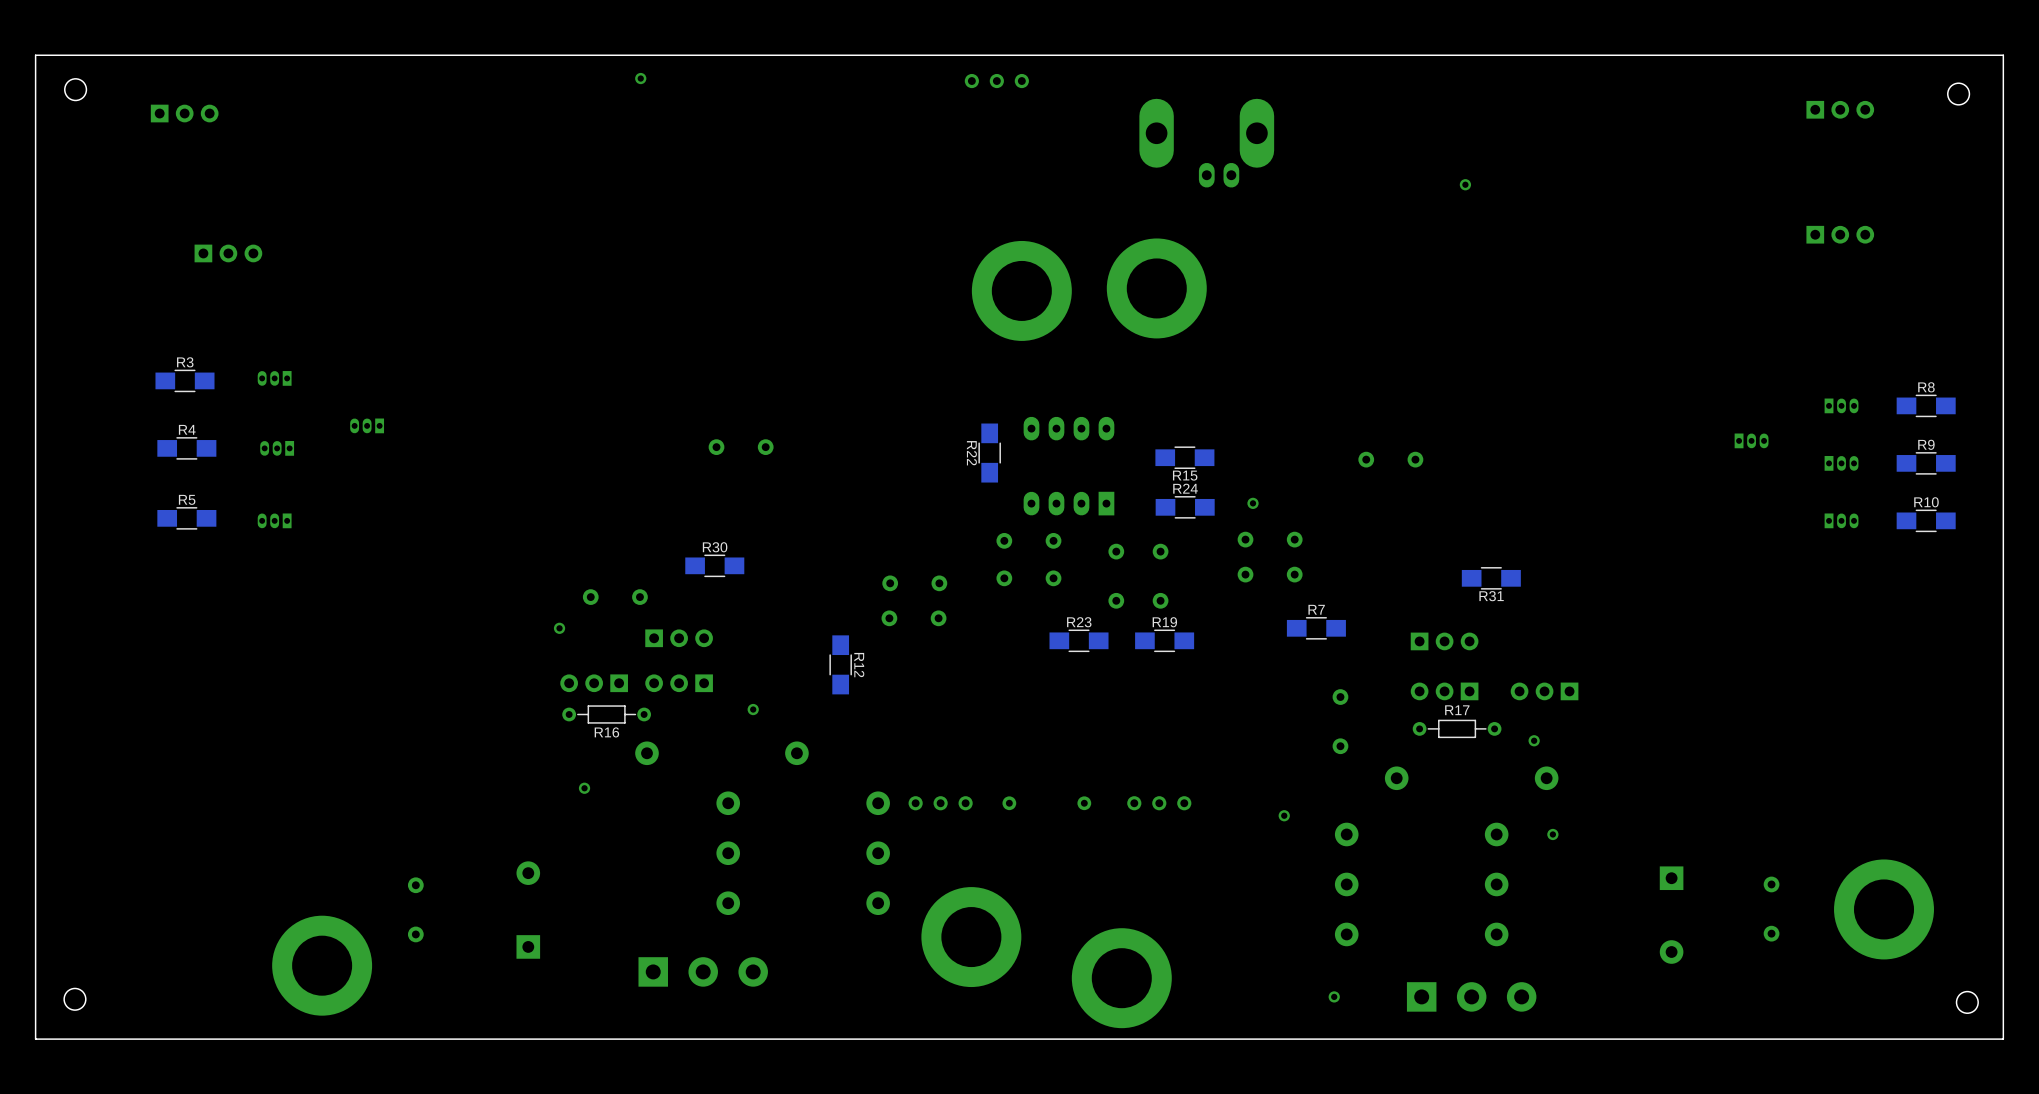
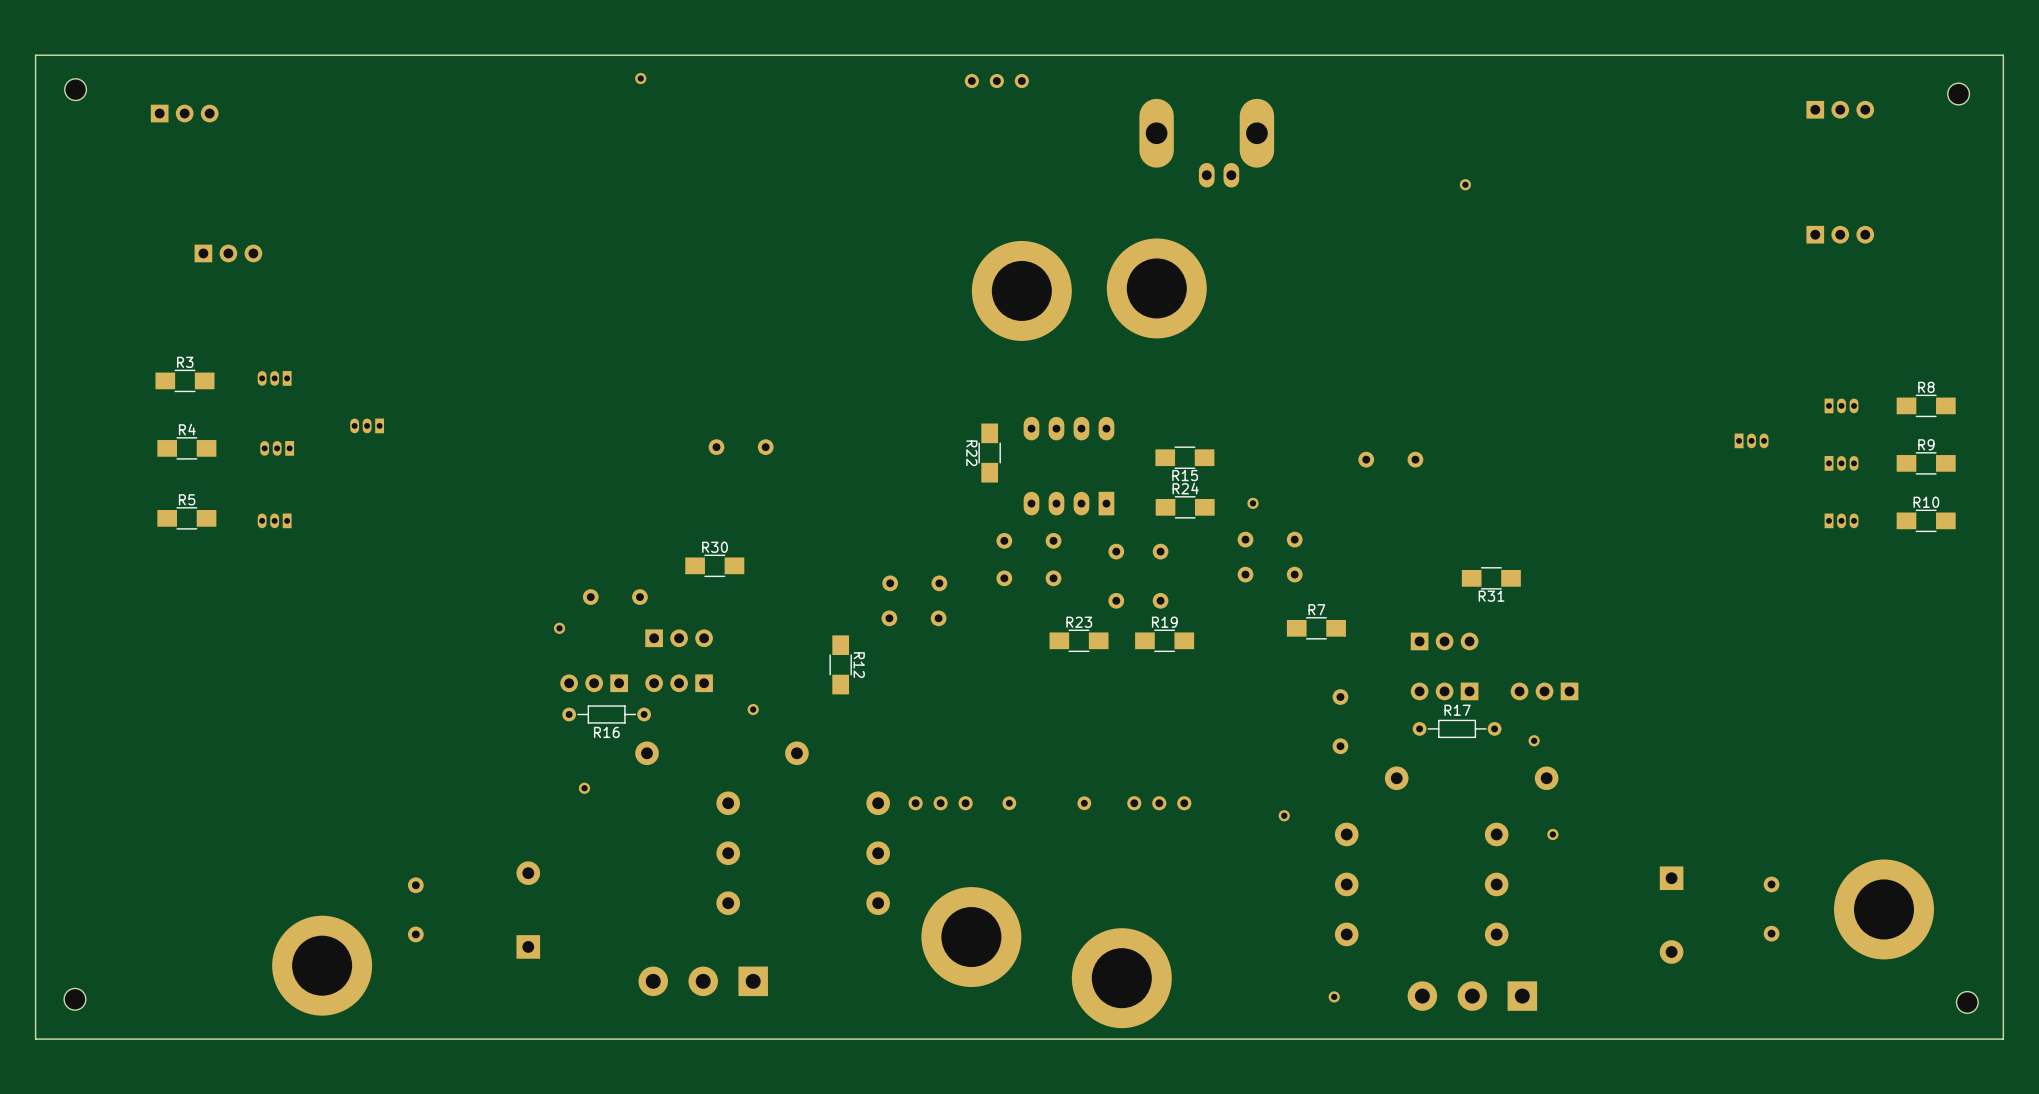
part rotation: 0° (703, 971) -> 180° (703, 981)
part rotation: 0° (1471, 996) -> 180° (1472, 996)

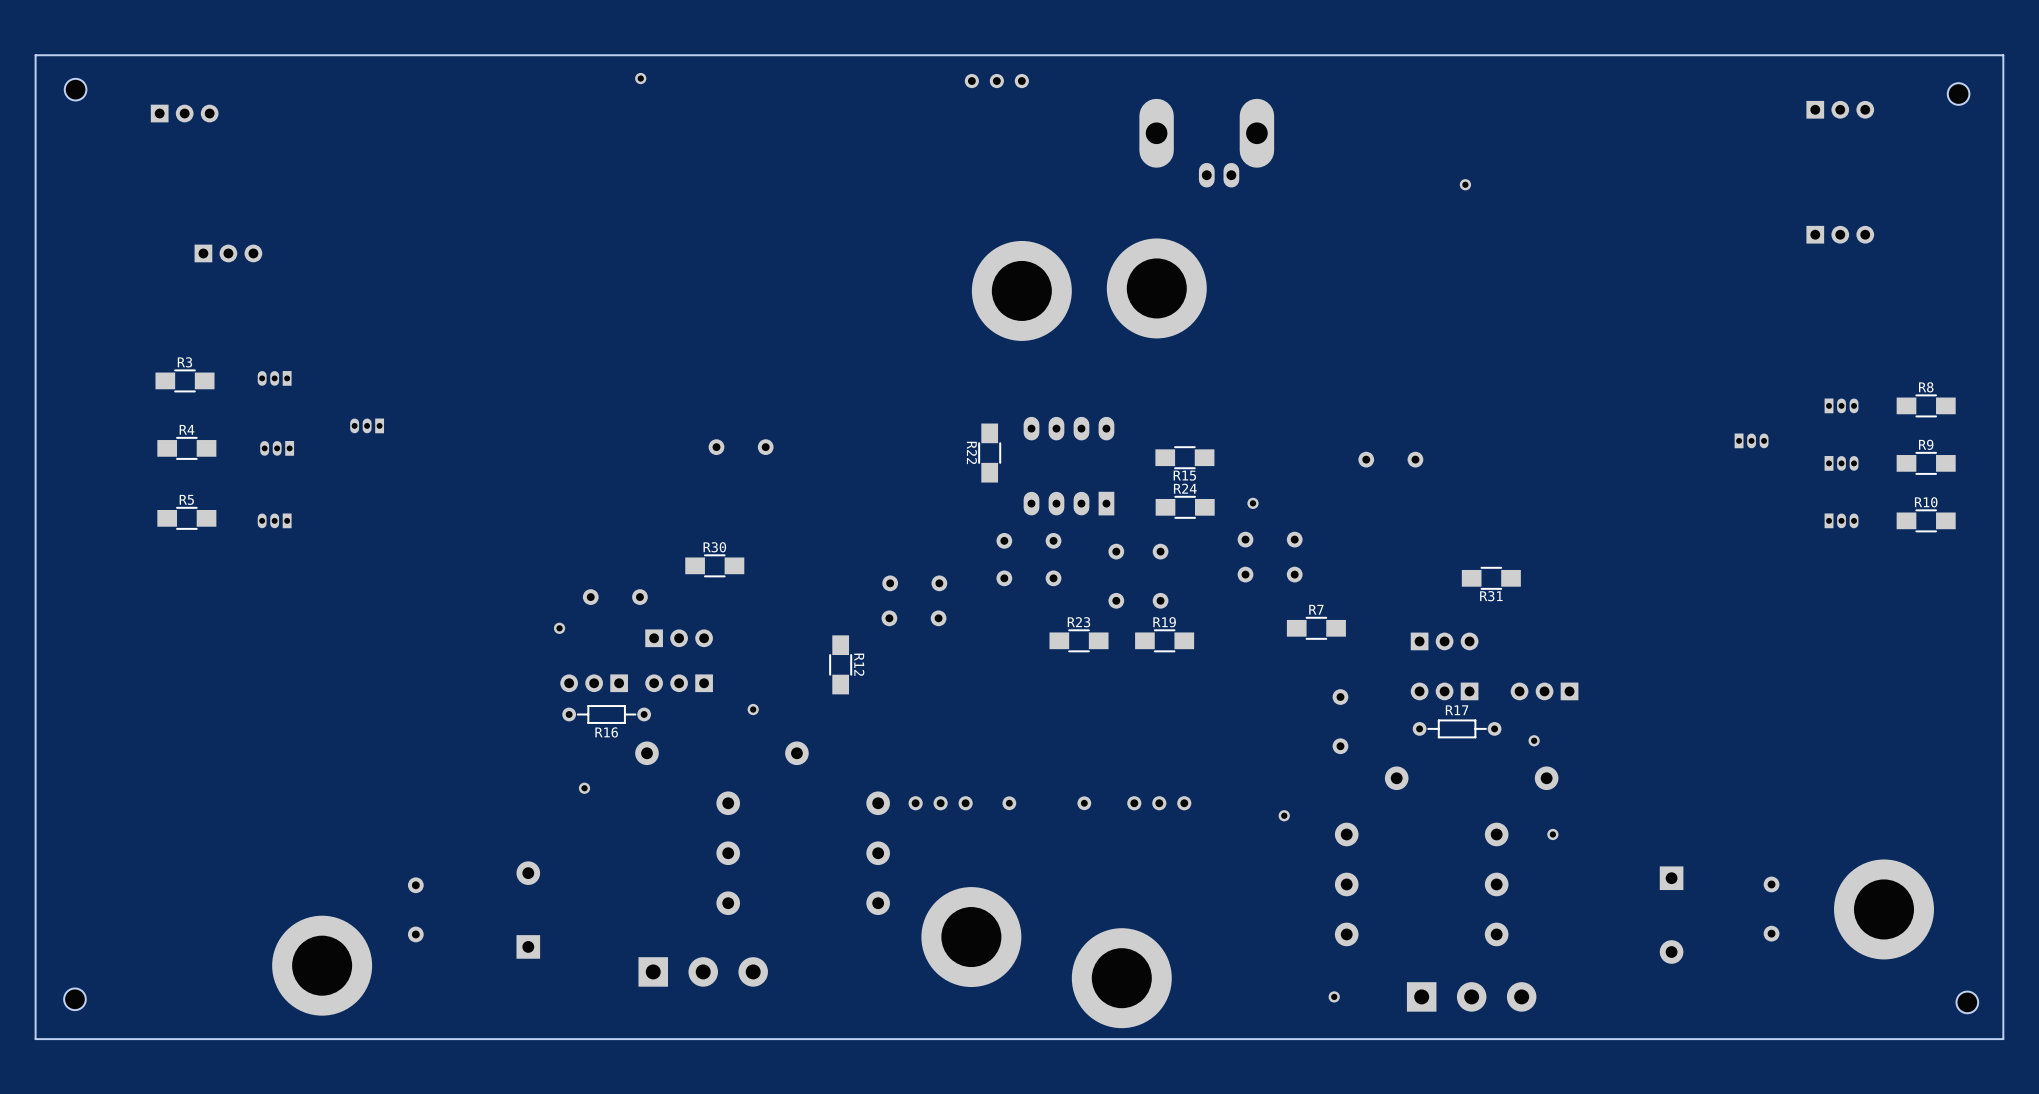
part rotation: 0° (703, 981) -> 180° (703, 971)
part rotation: 0° (1472, 996) -> 180° (1471, 996)

